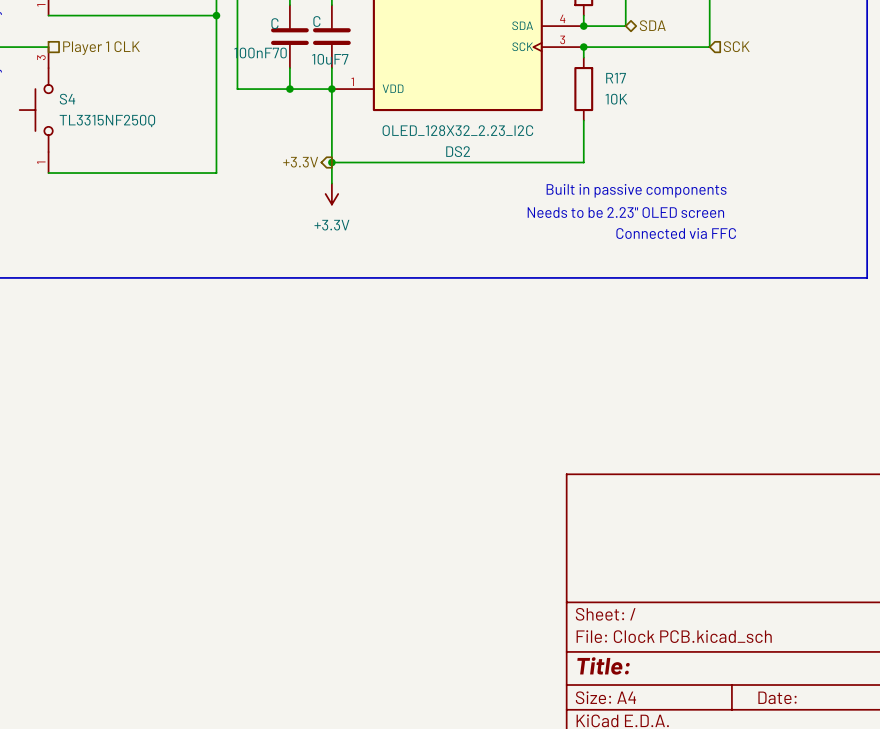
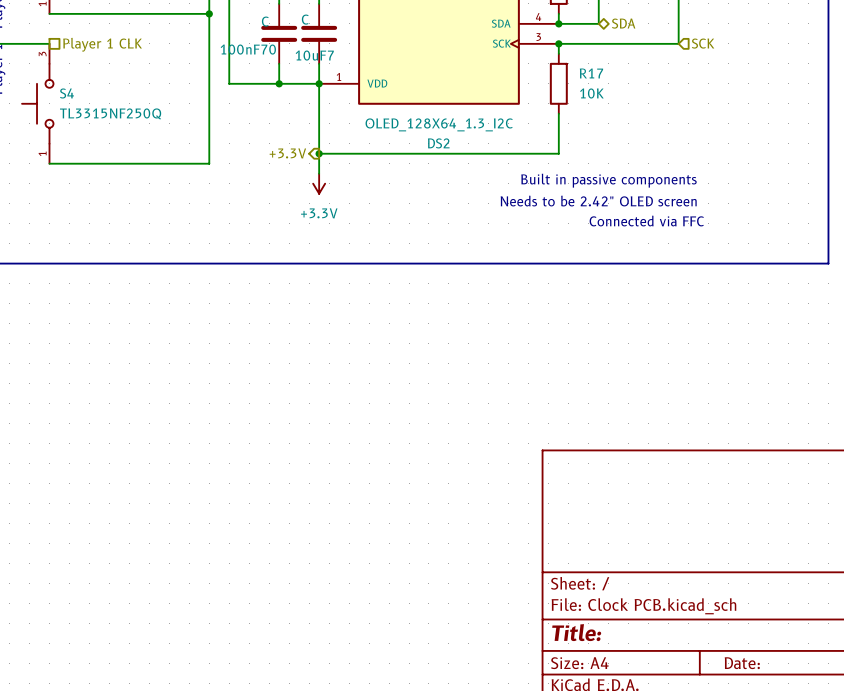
DS2 value: OLED_128X32_2.23_I2C (457, 130) -> OLED_128X64_1.3_I2C (439, 124)
text: Needs to be 2.23" OLED screen (625, 212) -> Needs to be 2.42" OLED screen (598, 201)

